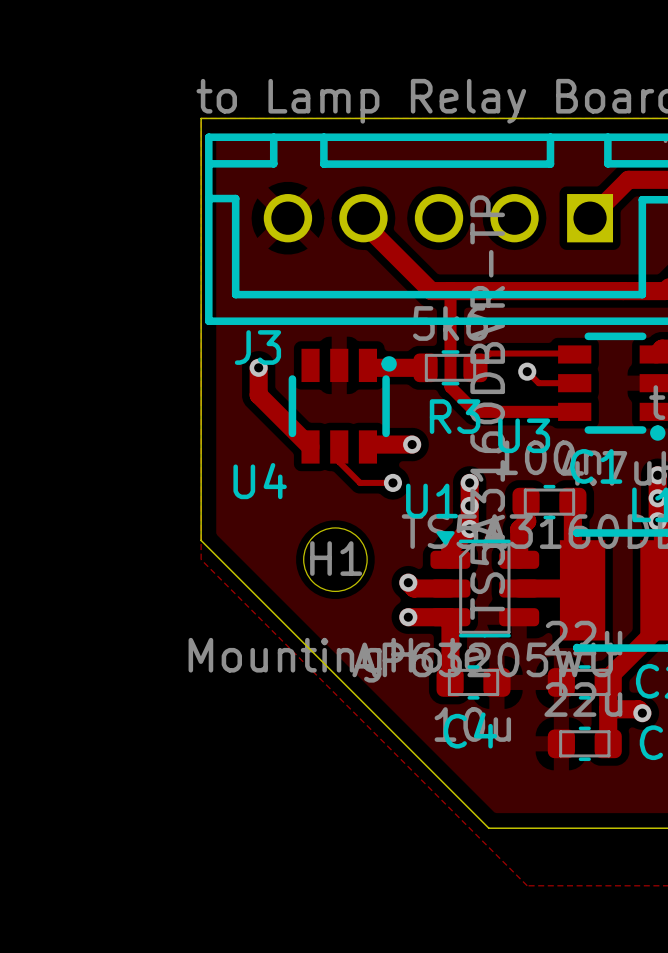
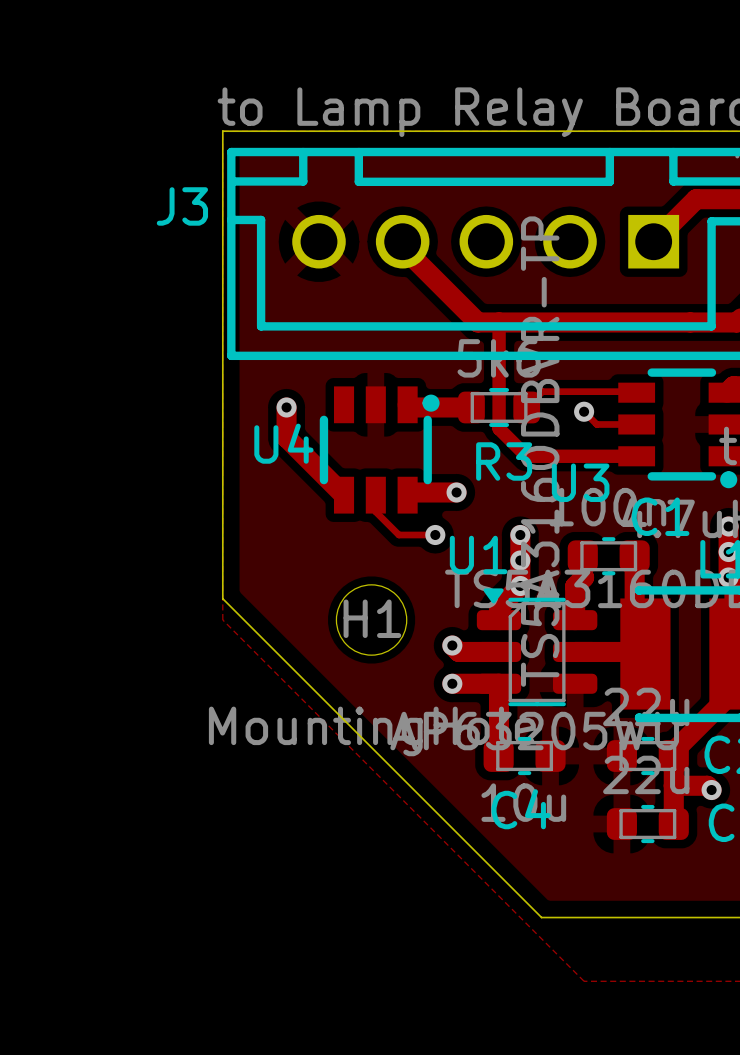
J3 name position: J3 (257, 347) -> J3 (182, 206)
U4 name position: U4 (260, 481) -> U4 (283, 443)

